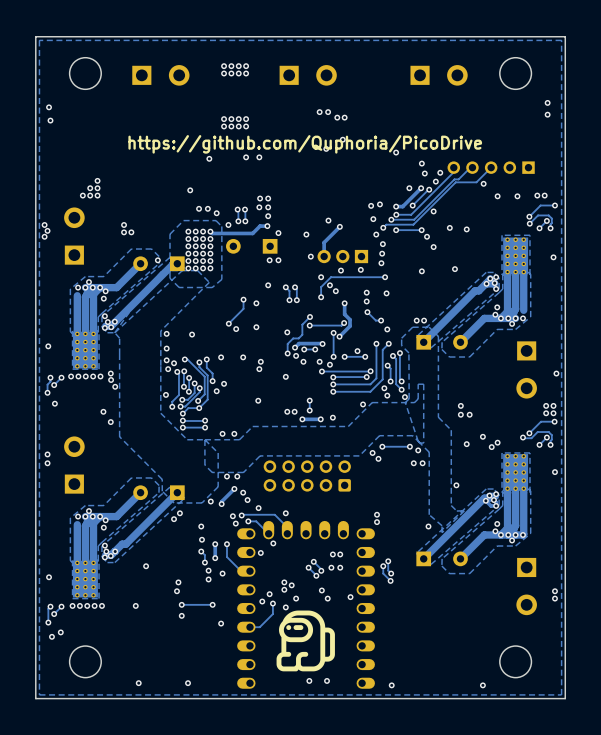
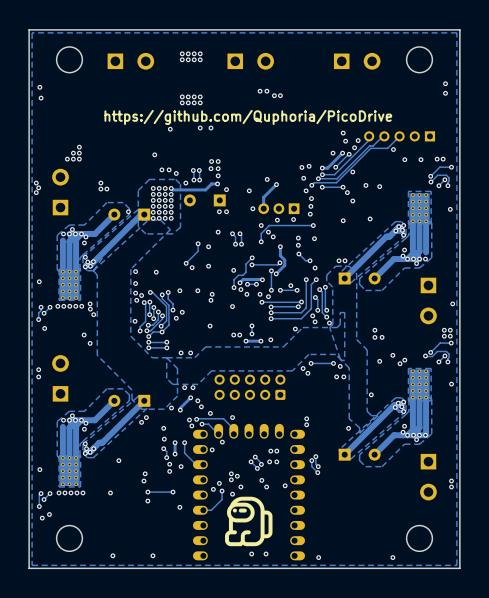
via: (342, 139) -> none
via: (326, 148) -> none
via: (396, 152) -> none

